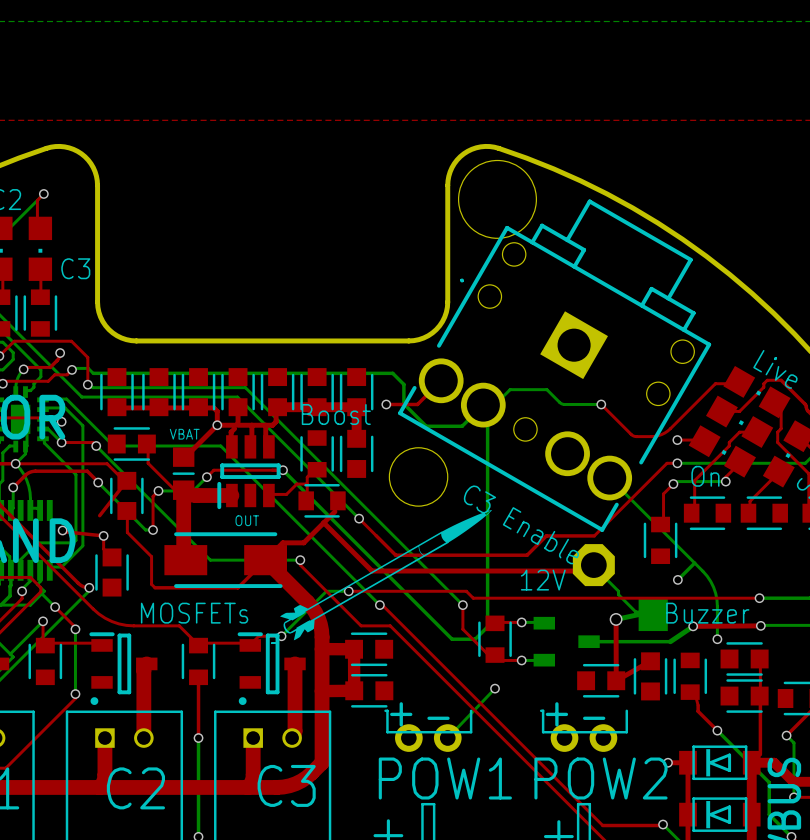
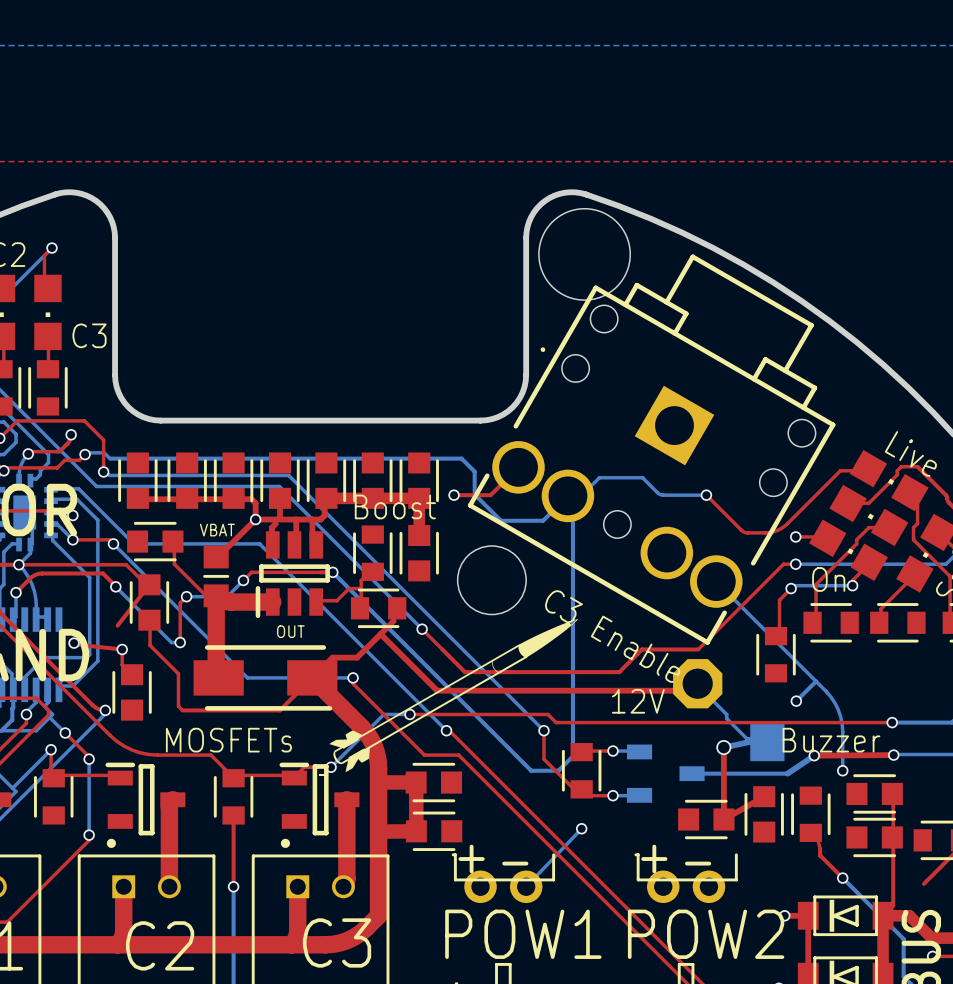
bottom track: (786, 735) (793, 742) (793, 797) -> none
via: (786, 735) -> none

